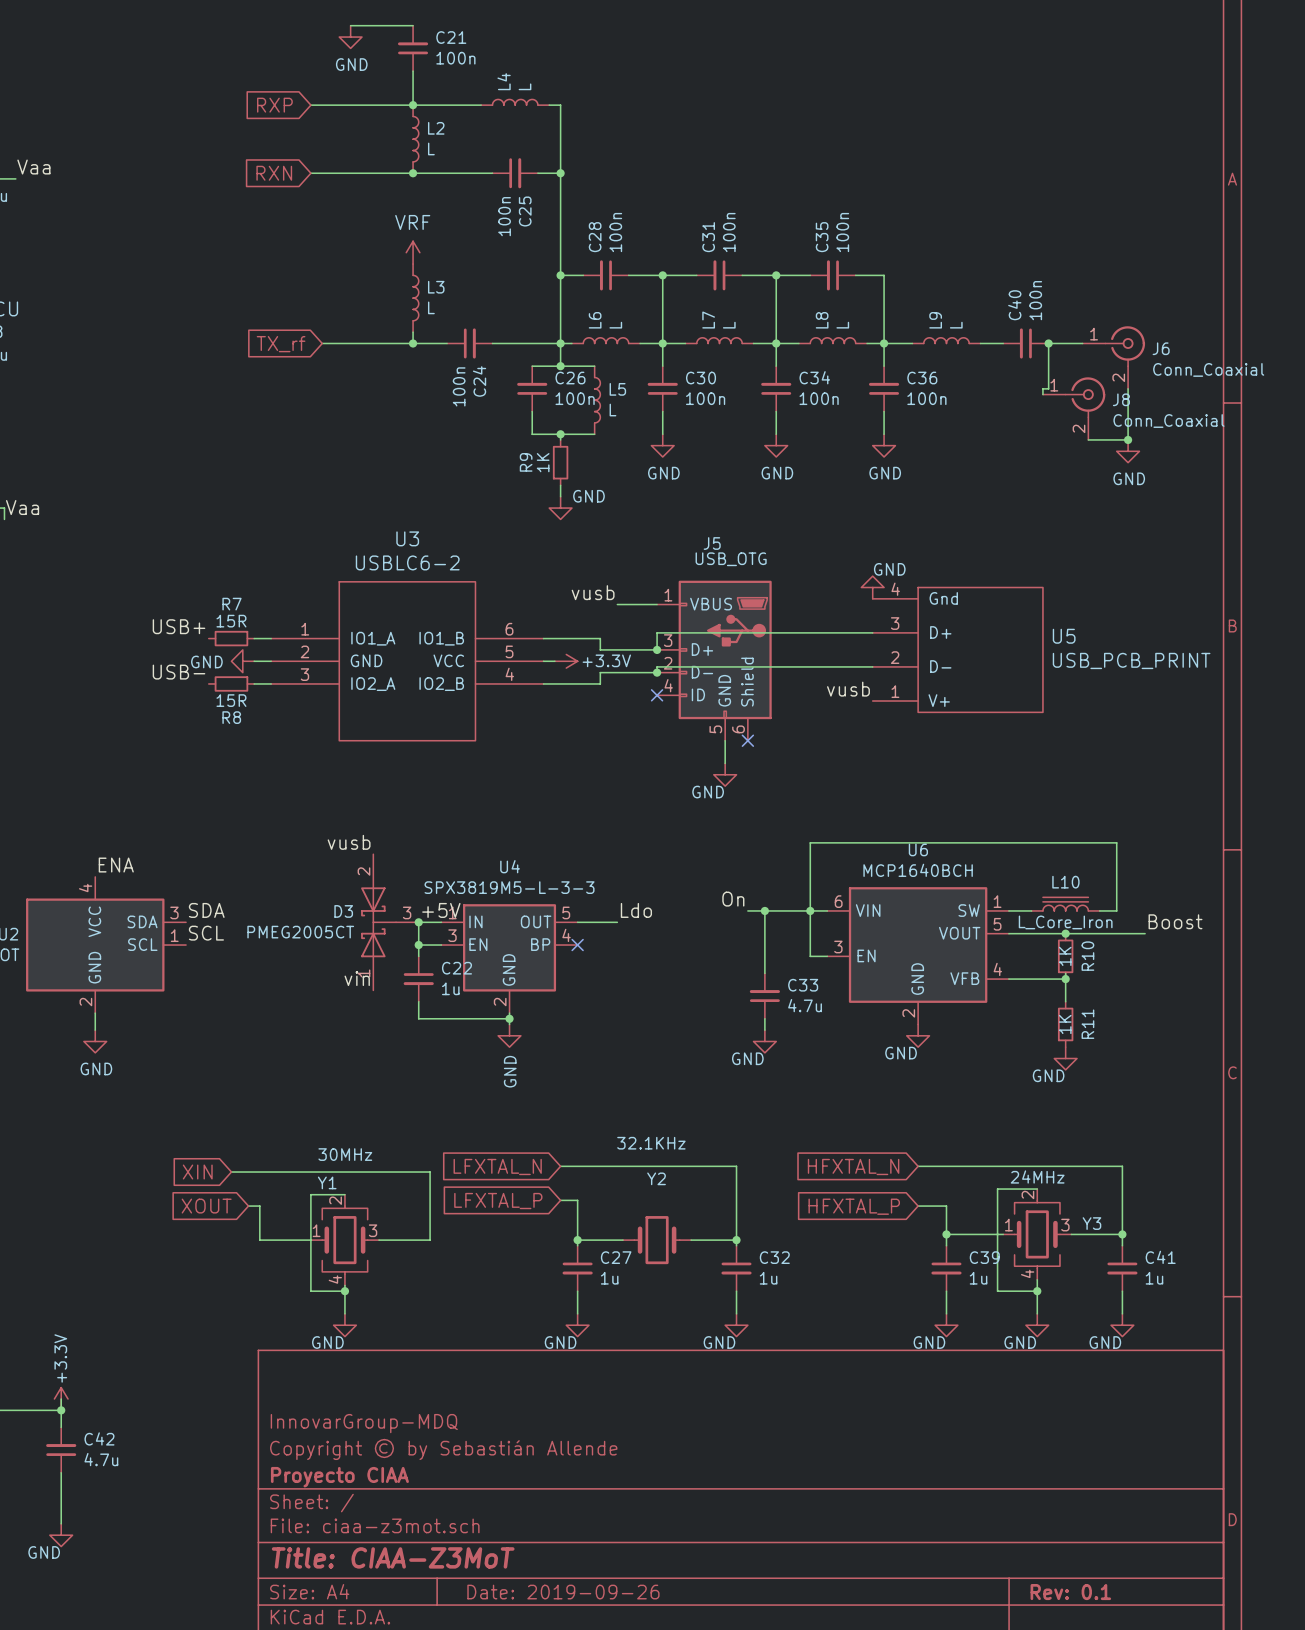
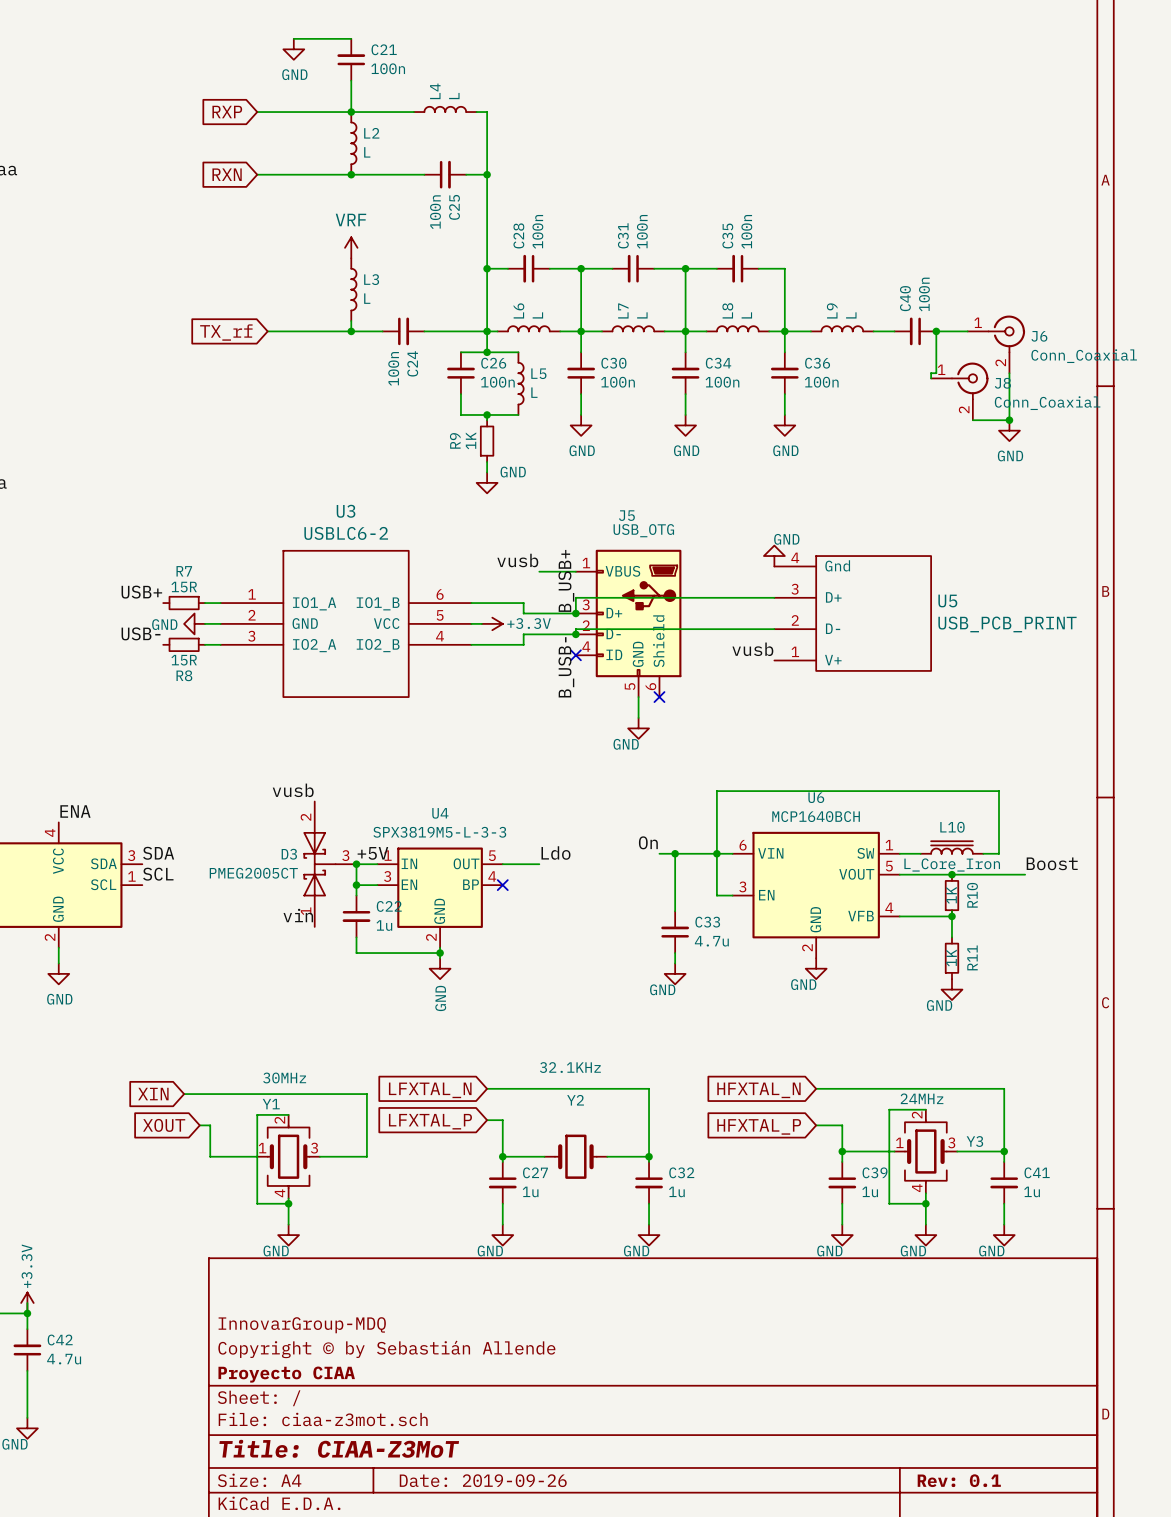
label: none -> B_USB+ (566, 580)
label: none -> B_USB- (566, 667)

